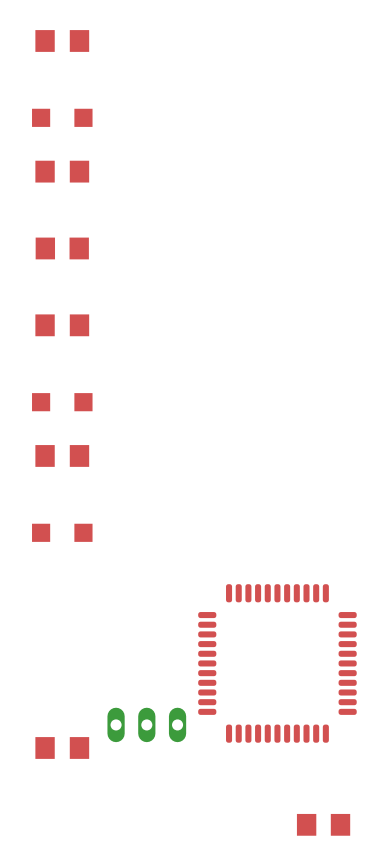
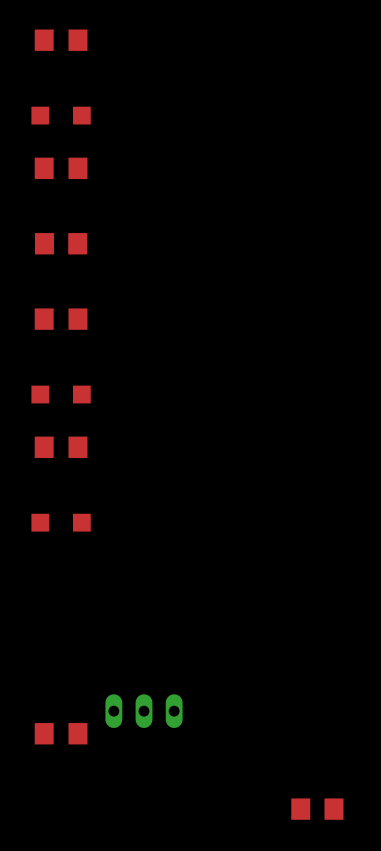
part: (277, 663) -> none

